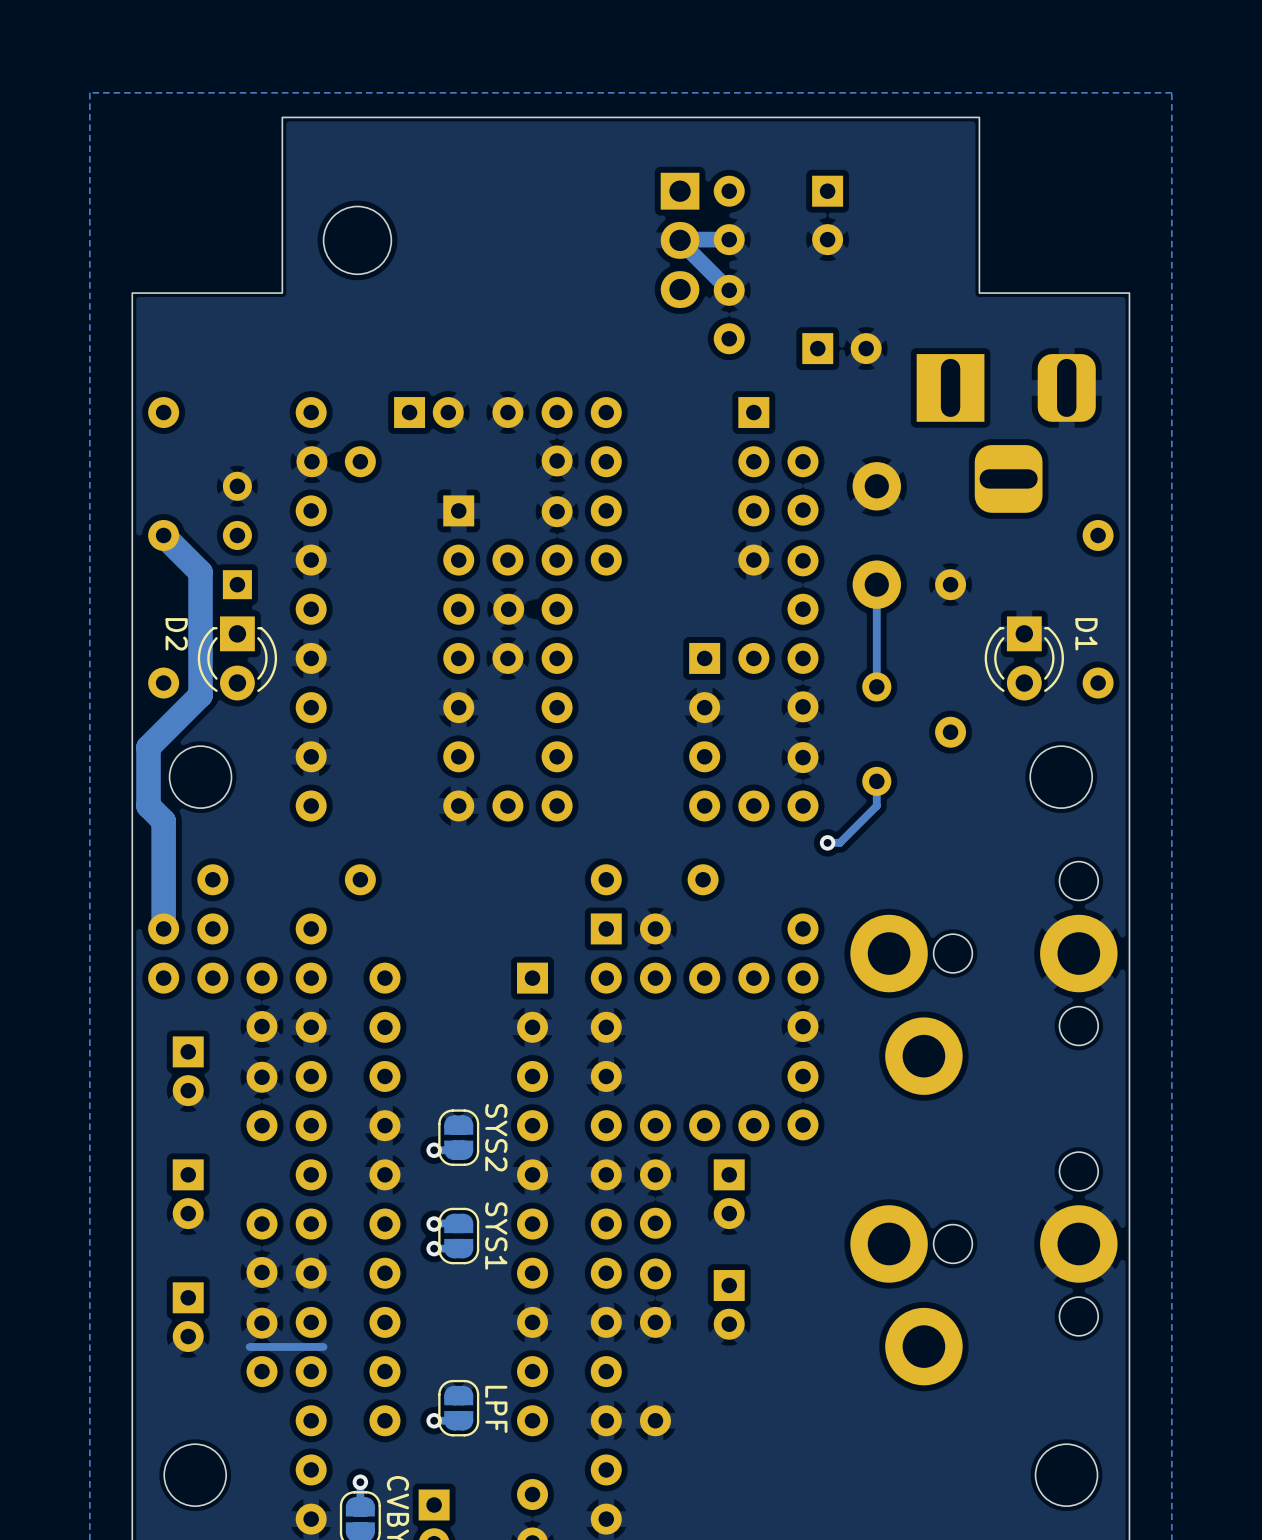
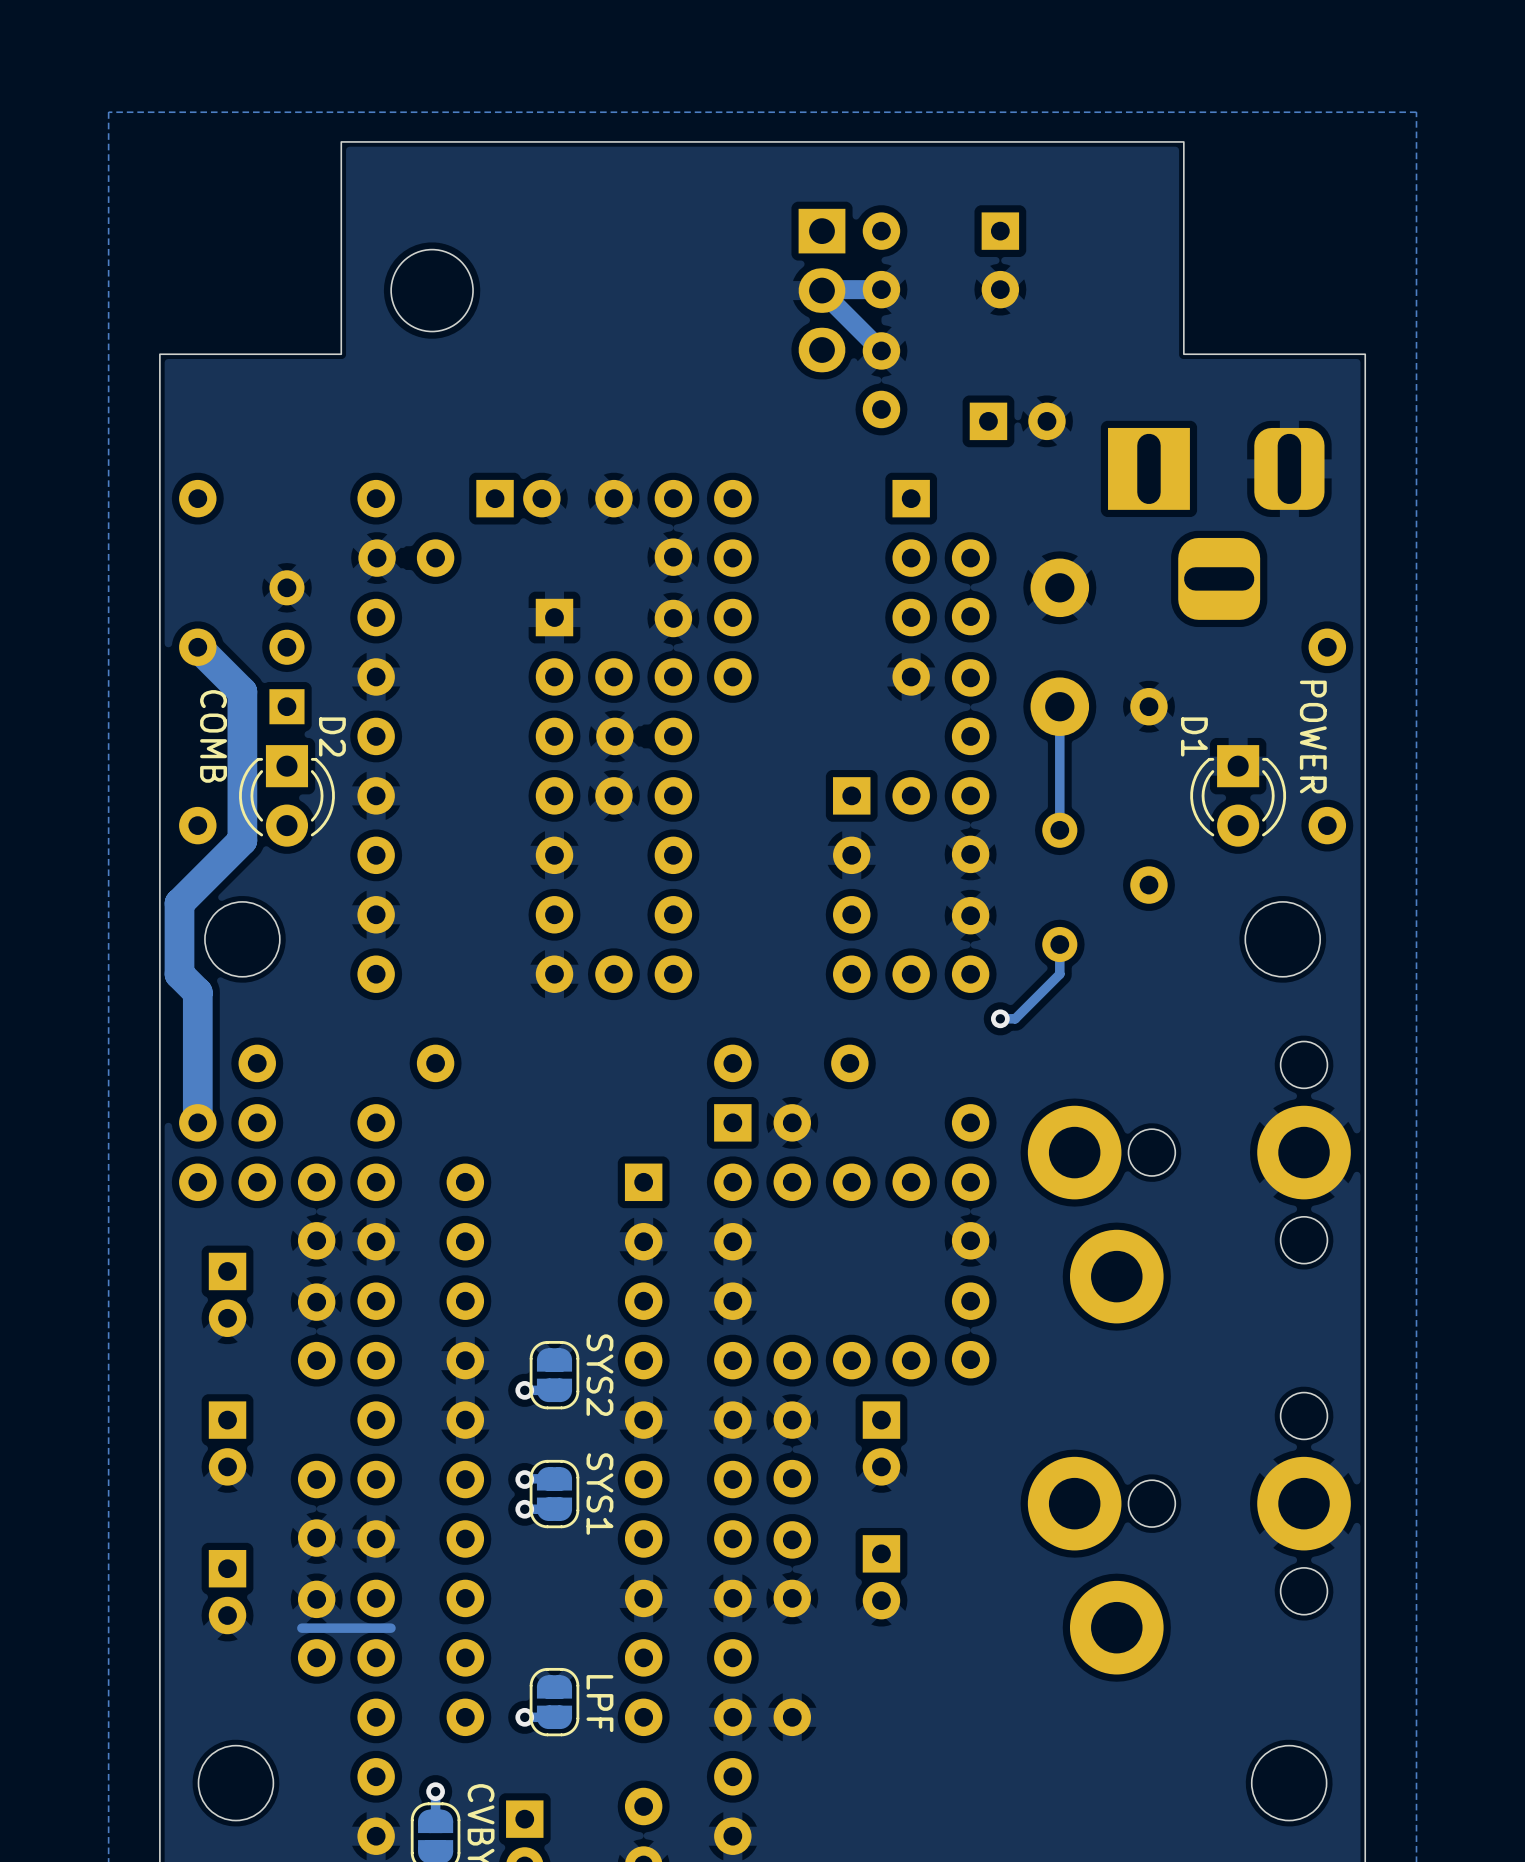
D2 value: none -> COMB (213, 736)
D1 value: none -> POWER (1313, 736)
D2 name position: D2 (176, 634) -> D2 (332, 736)
D1 name position: D1 (1086, 634) -> D1 (1194, 736)

